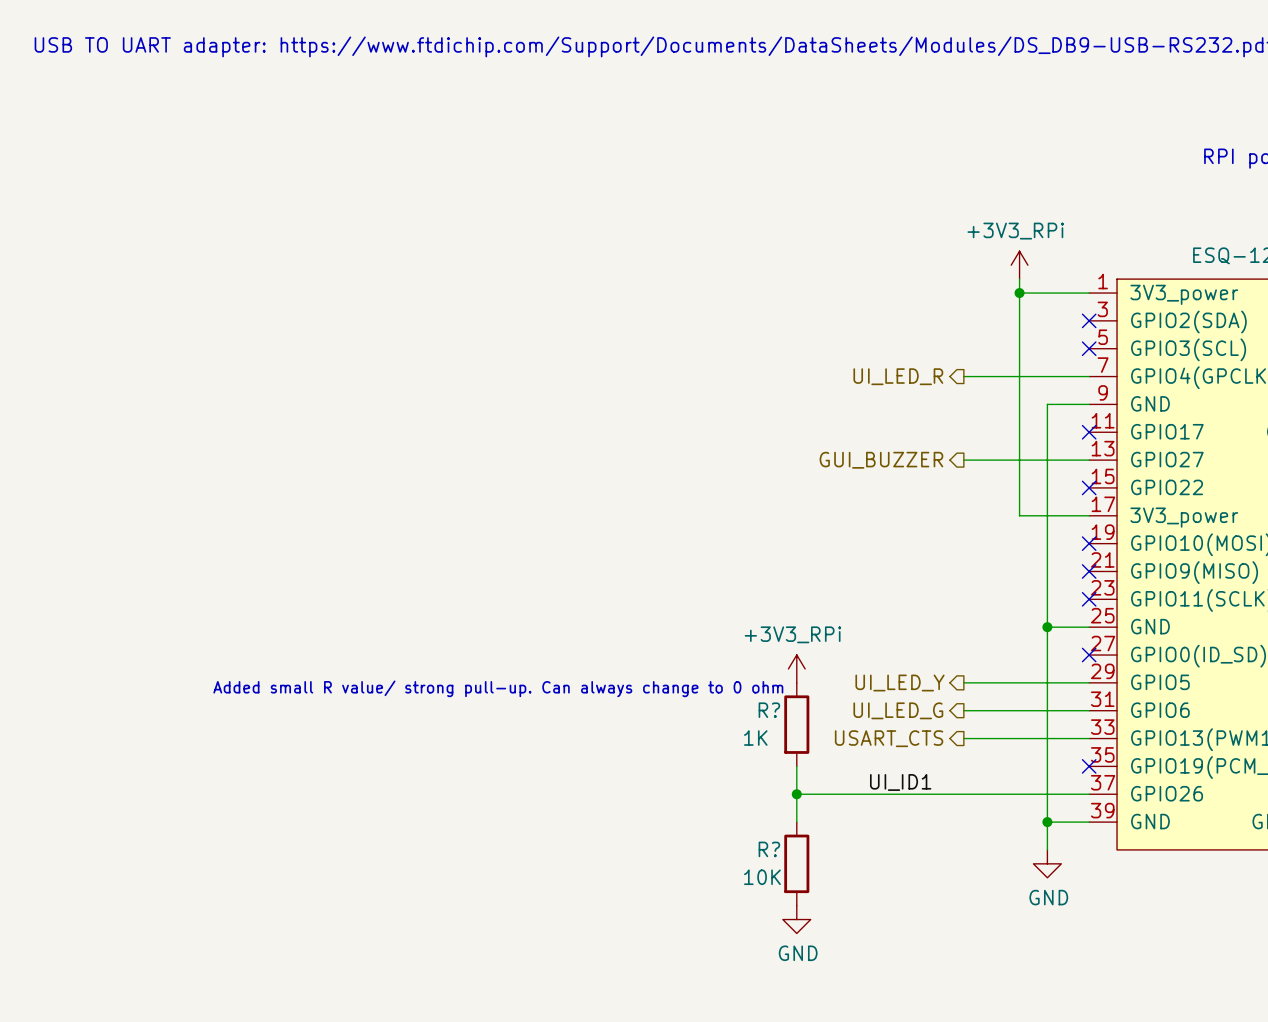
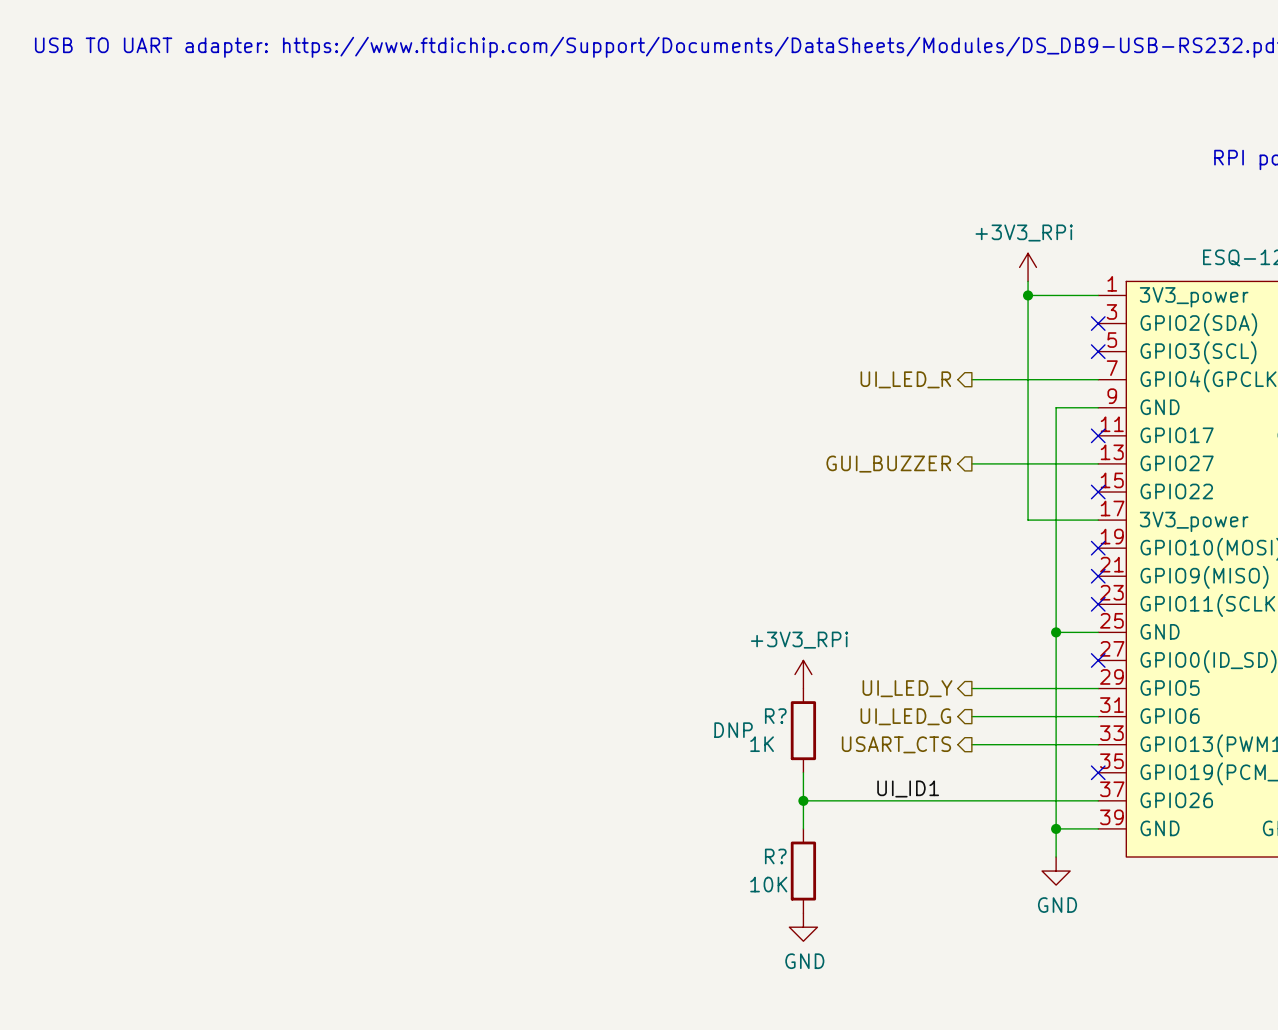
text: Added small R value/ strong pull-up. Can always change to 0 ohm (498, 688) -> none
R? text: none -> DNP (733, 730)

